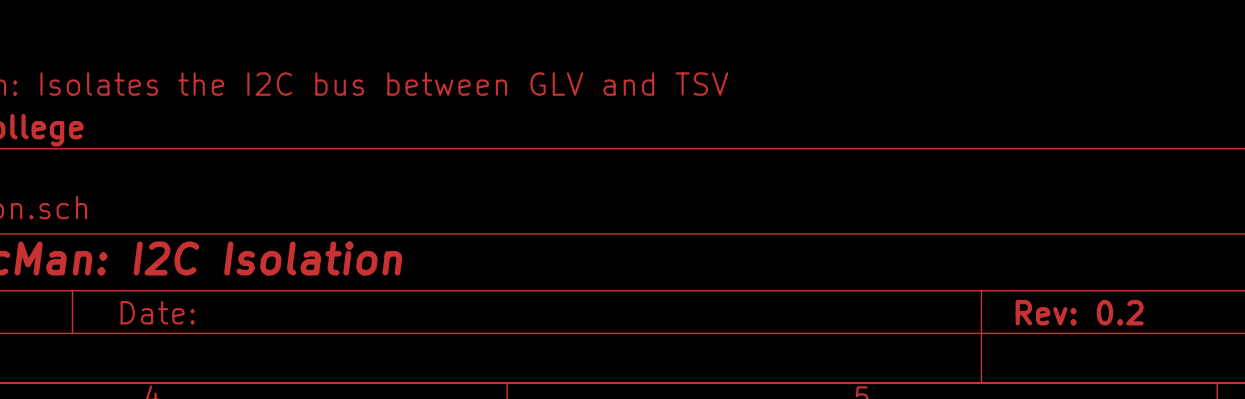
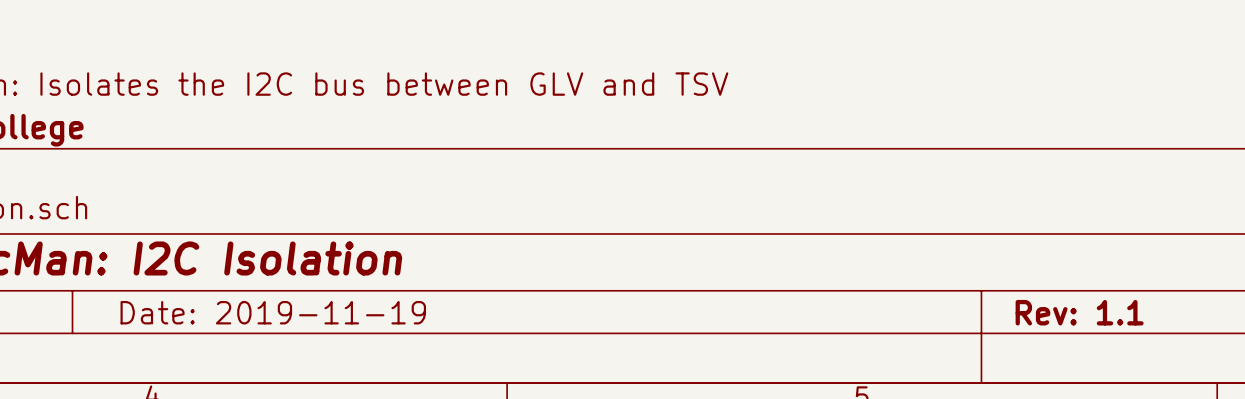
title block: Date: (157, 312) -> Date: 2019-11-19 (273, 312)
title block: Rev: 0.2 (1079, 312) -> Rev: 1.1 (1079, 312)

